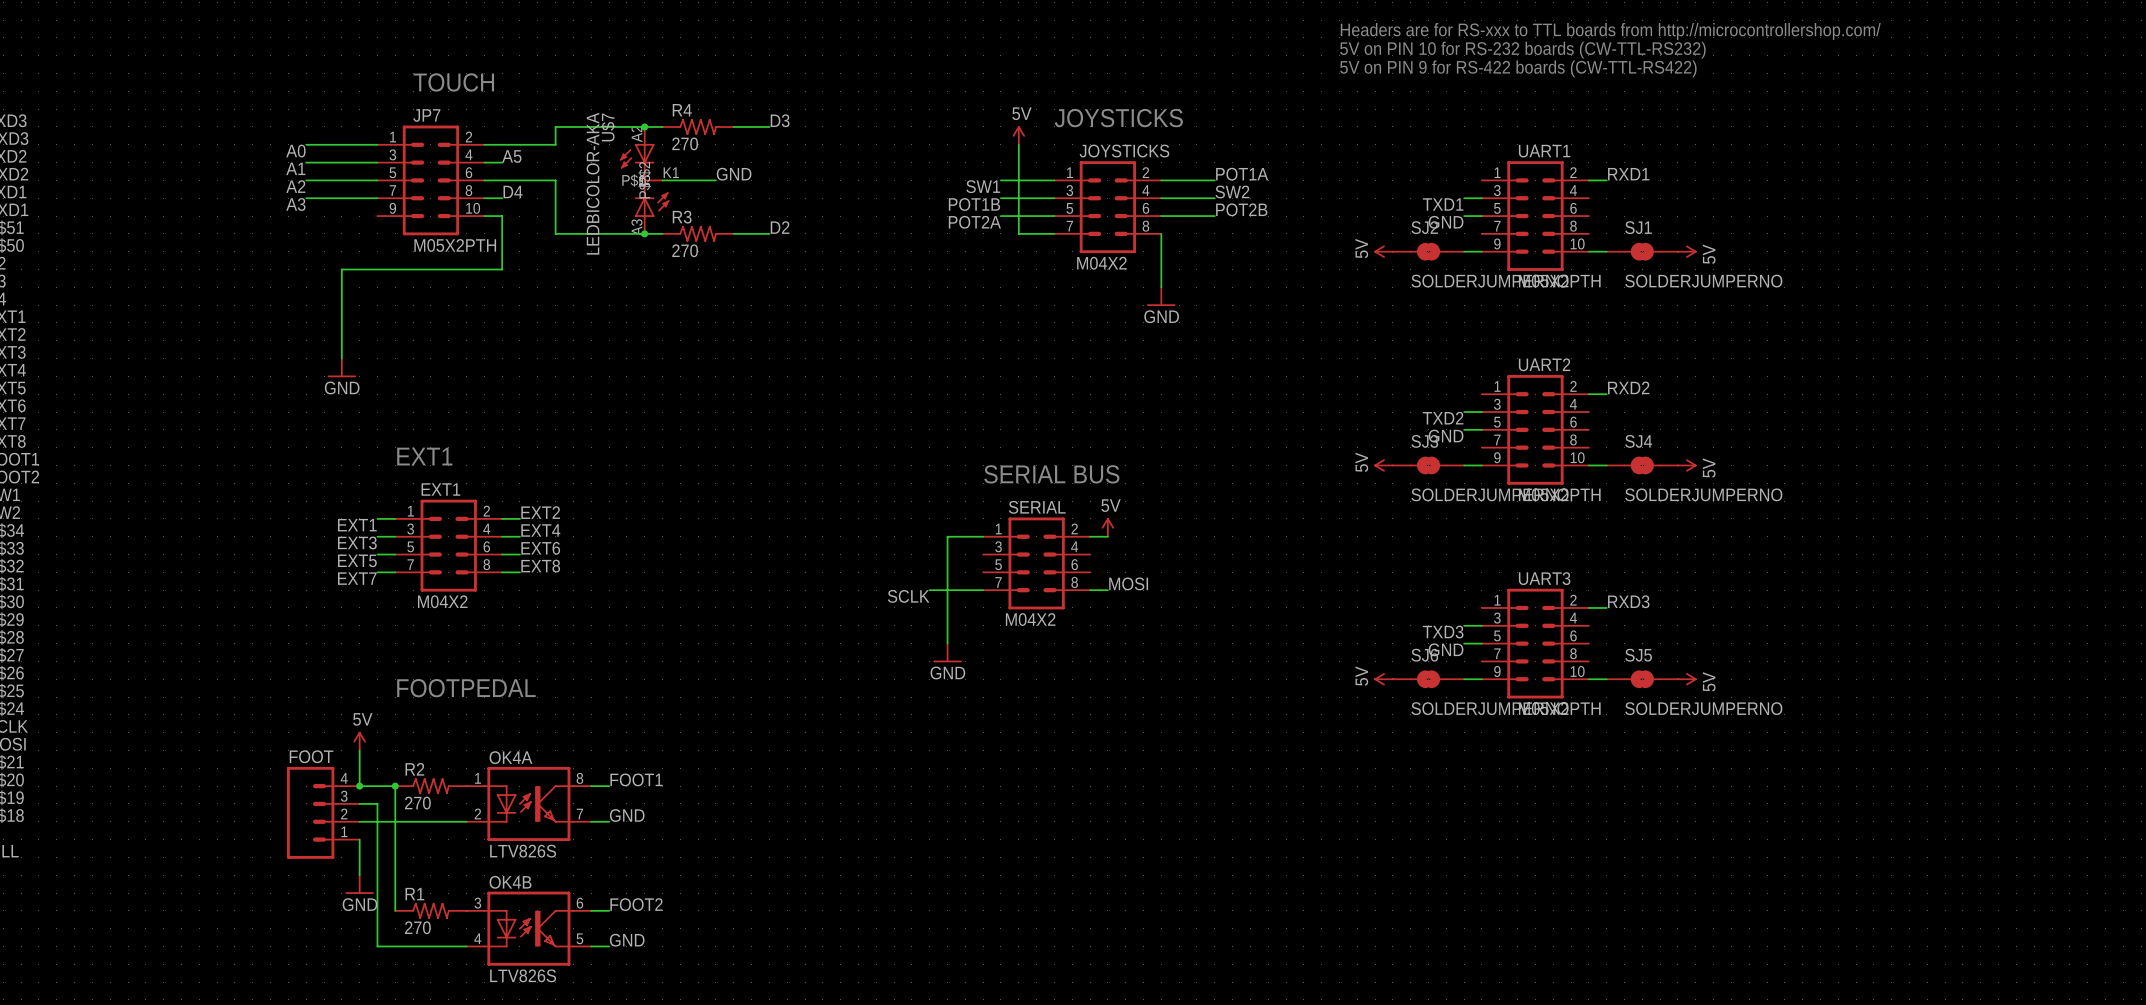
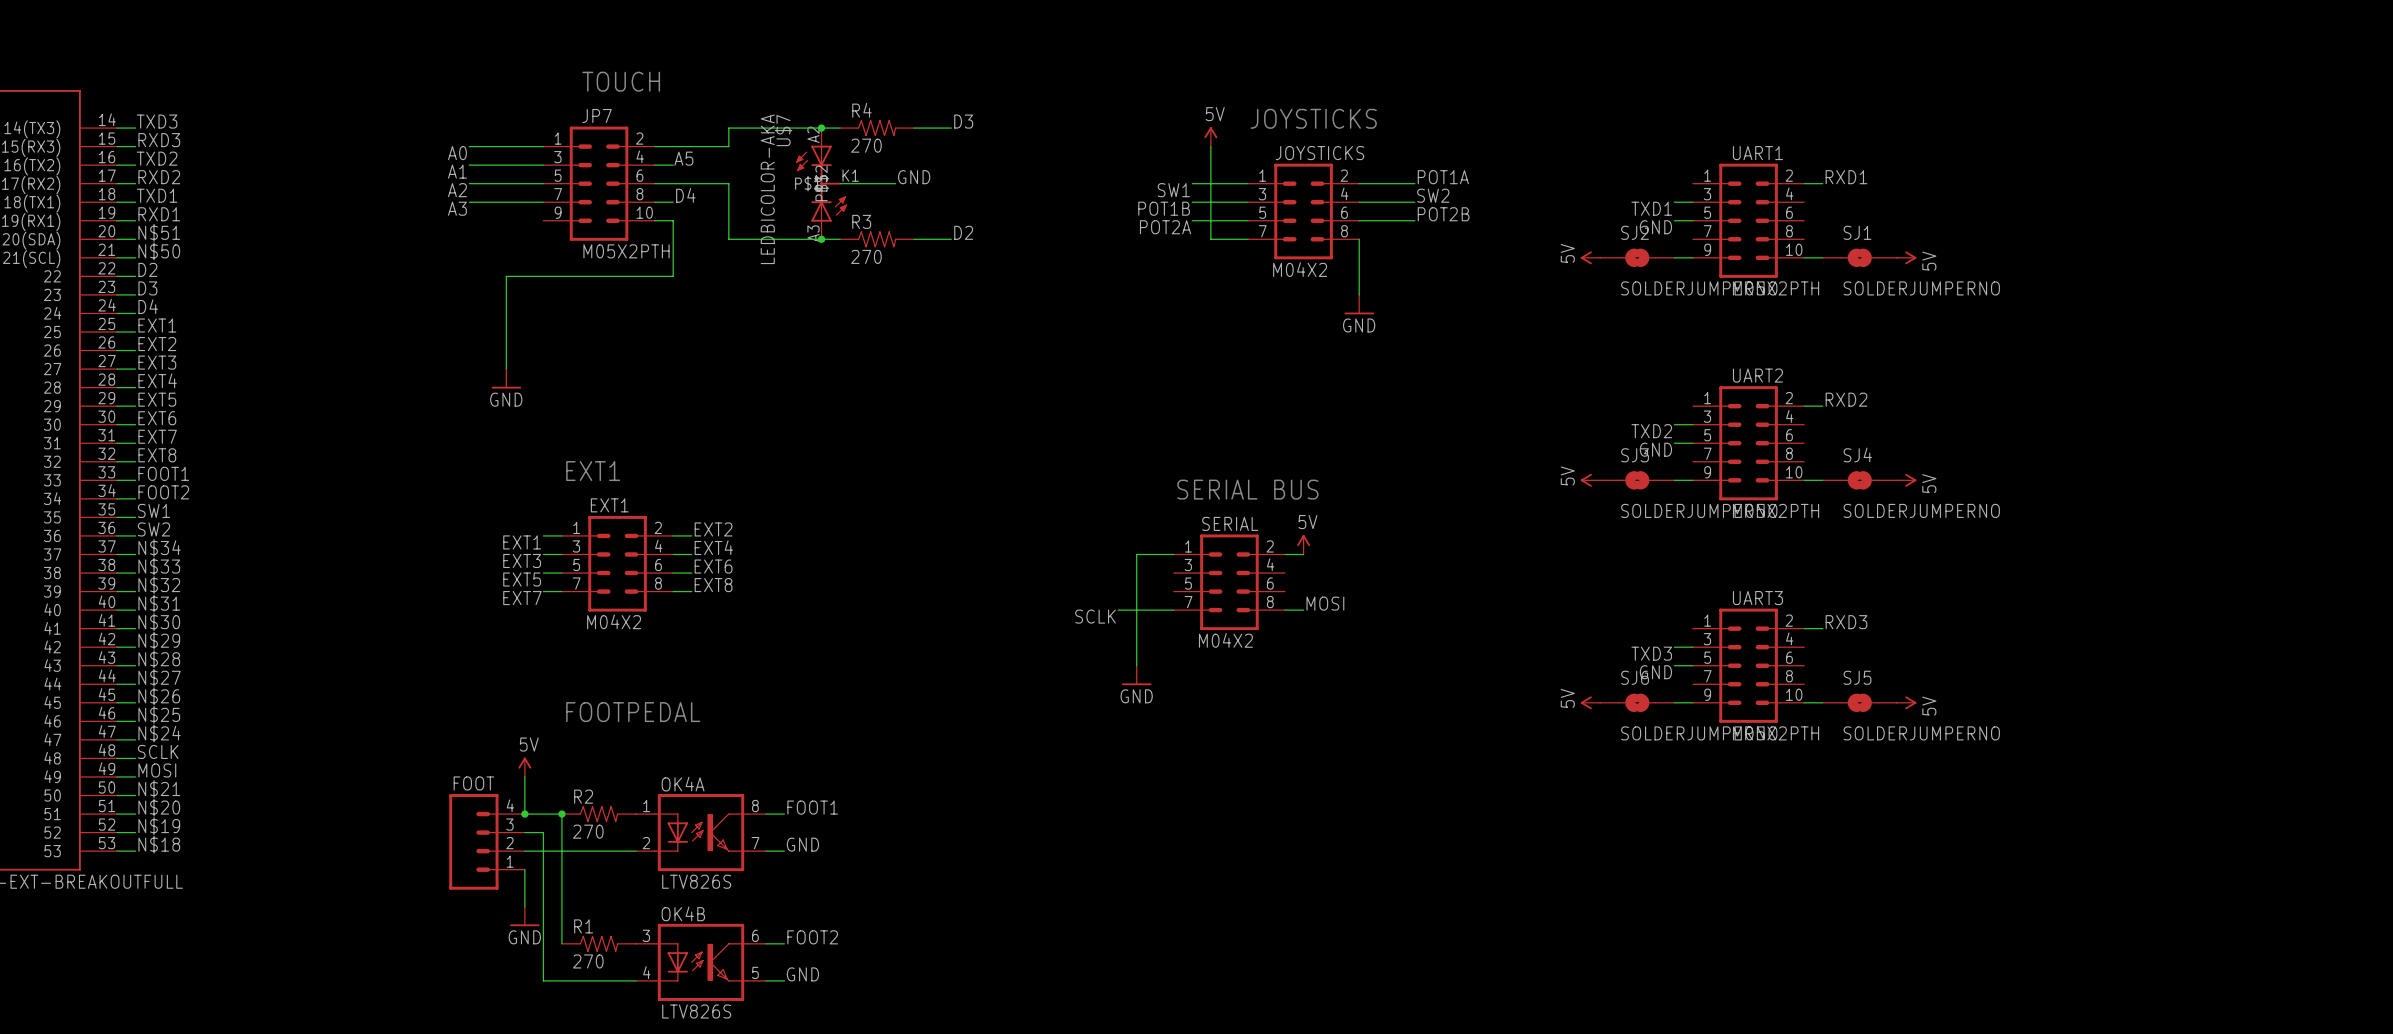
text: Headers are for RS-xxx to TTL boards from http://microcontrollershop.com/ (1610, 31) -> none
text: 5V on PIN 10 for RS-232 boards (CW-TTL-RS232) (1522, 50) -> none
text: 5V on PIN 9 for RS-422 boards (CW-TTL-RS422) (1518, 68) -> none

